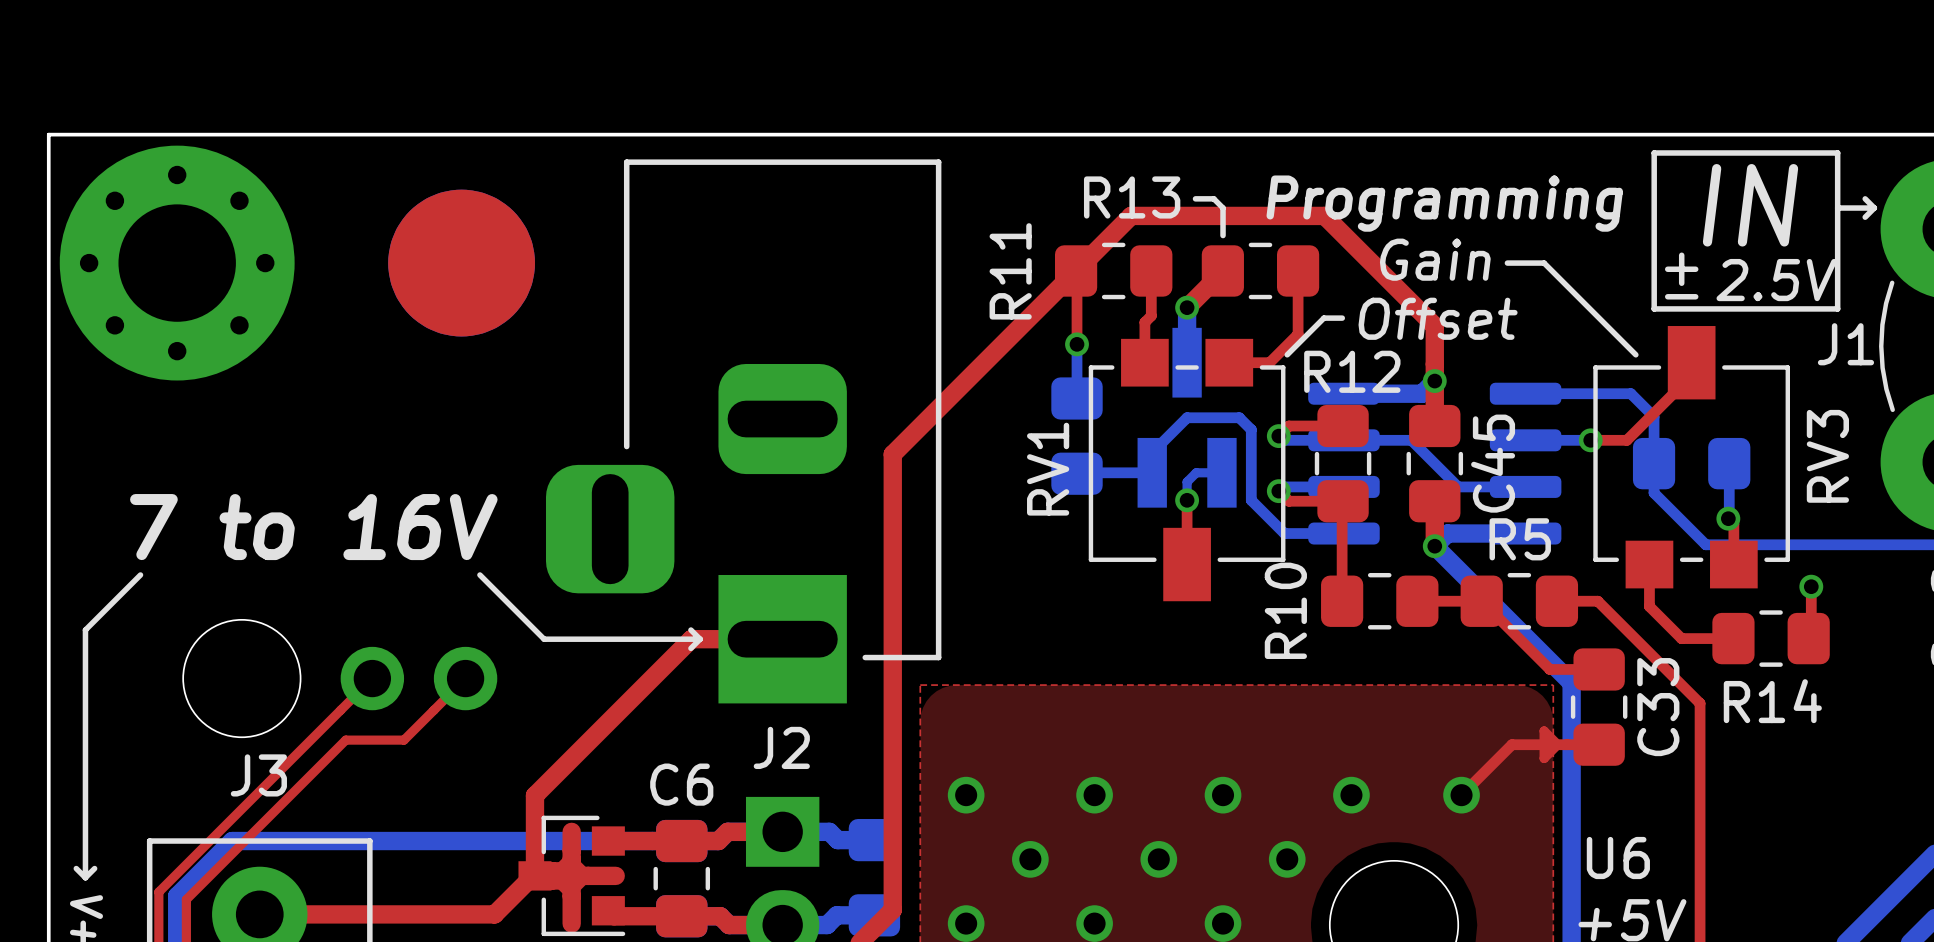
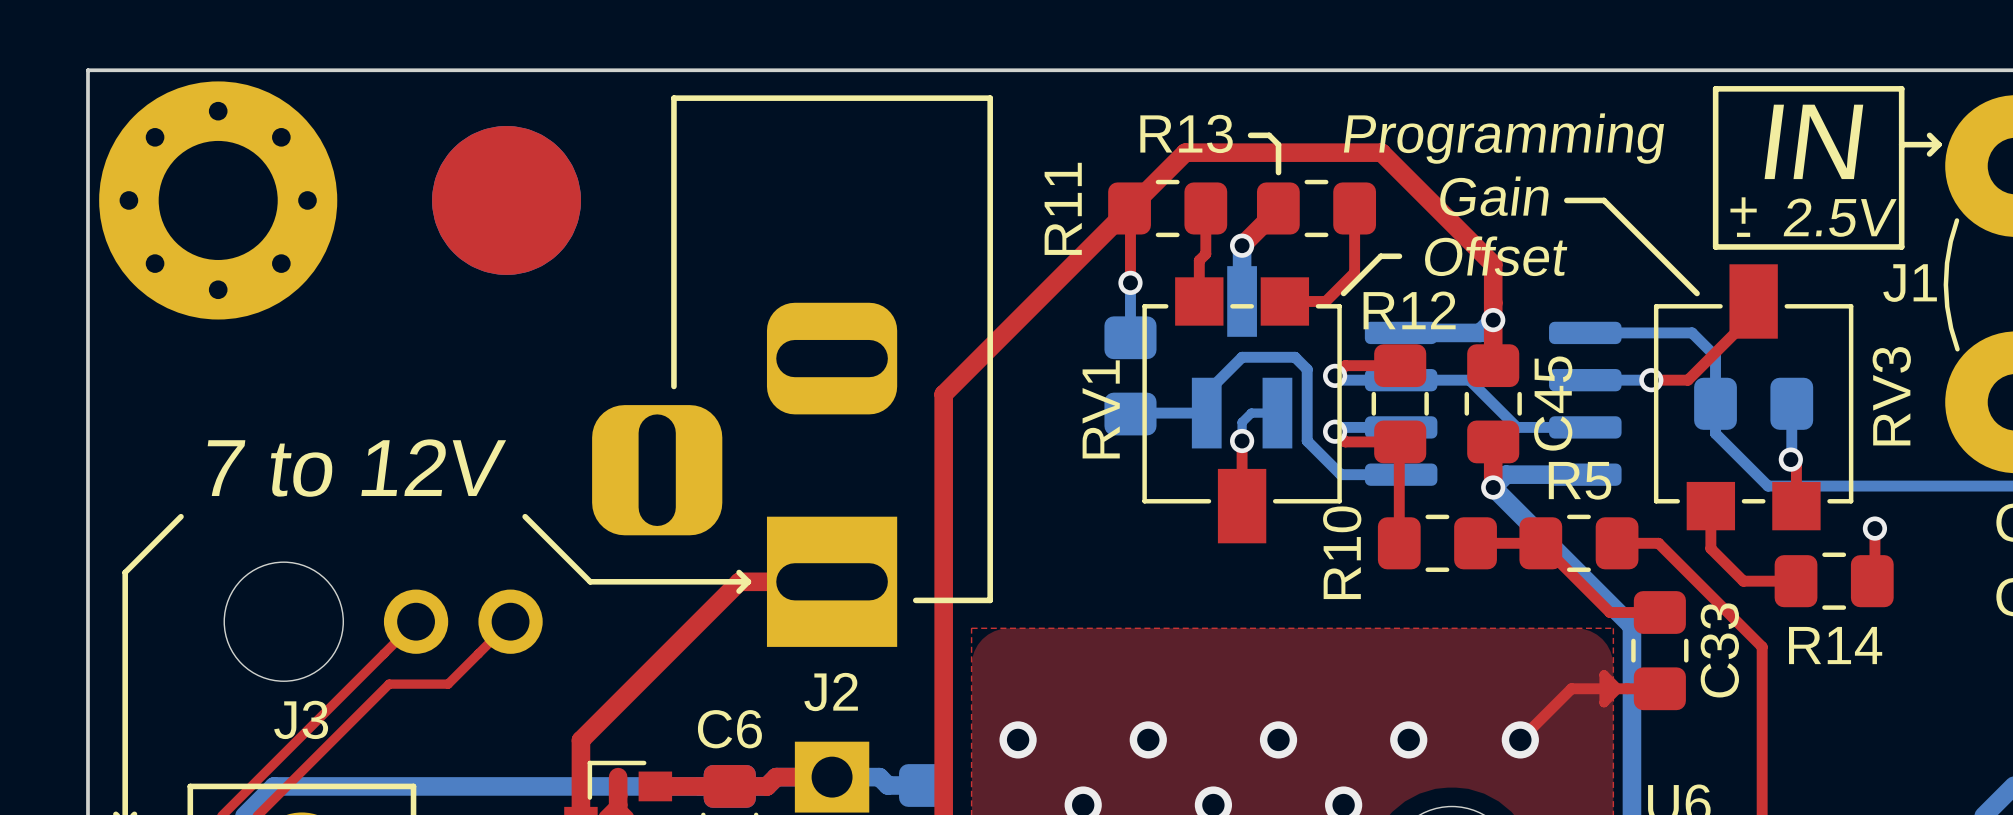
text: 7 to 16V (313, 527) -> 7 to 12V (356, 468)

